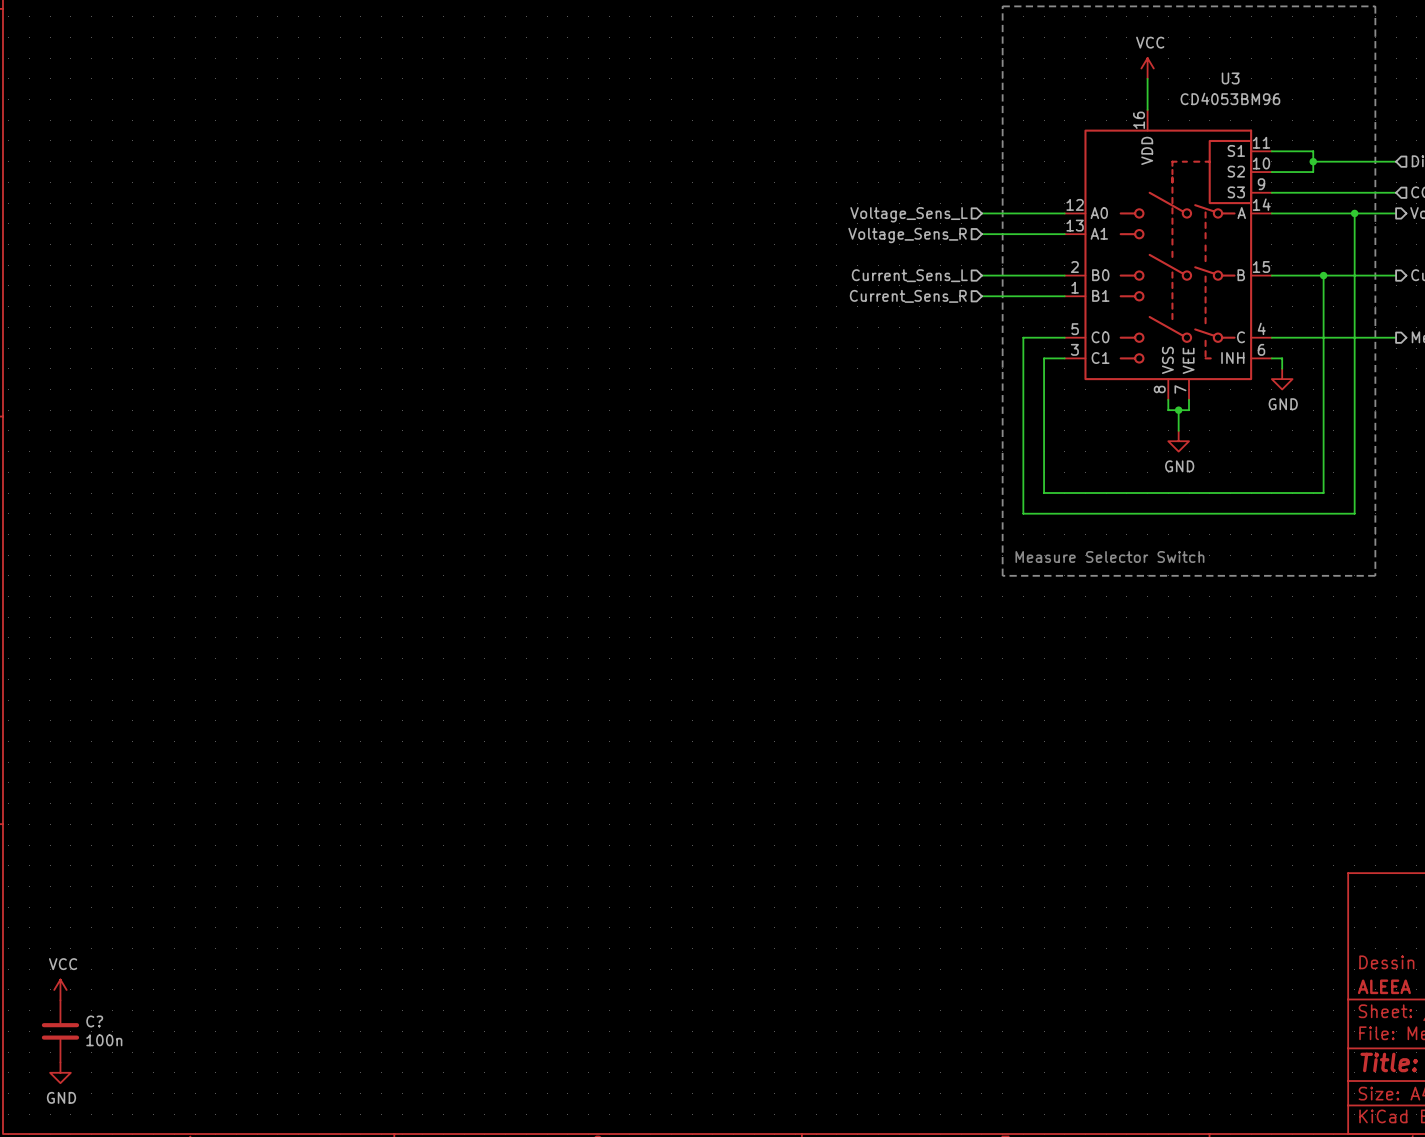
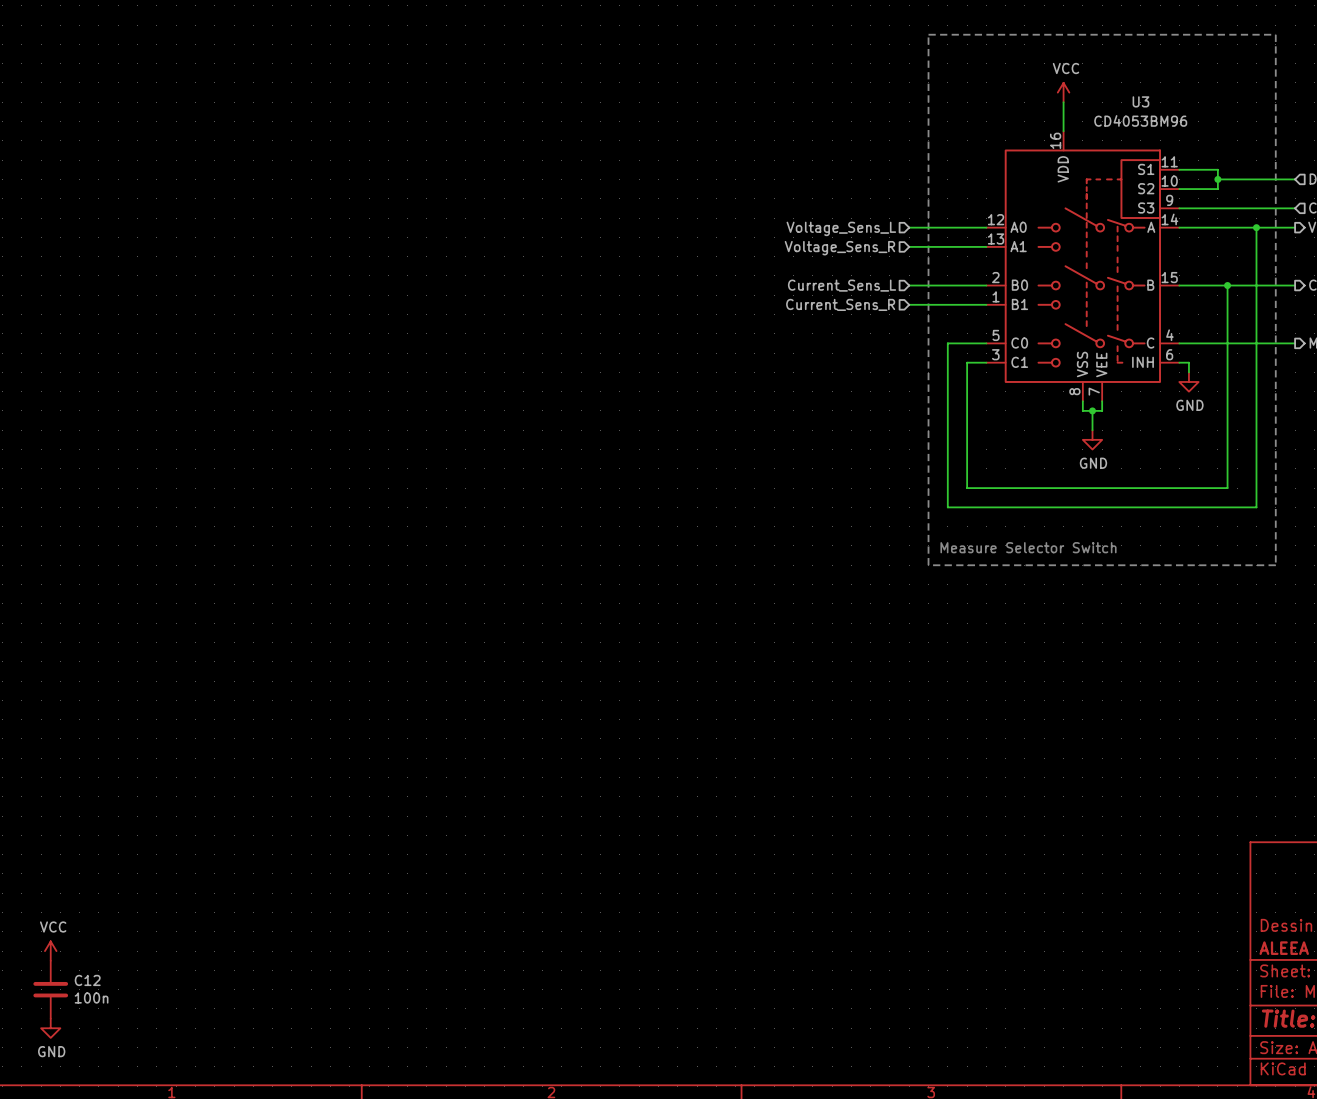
C? name: C? (94, 1021) -> C12 (87, 980)

